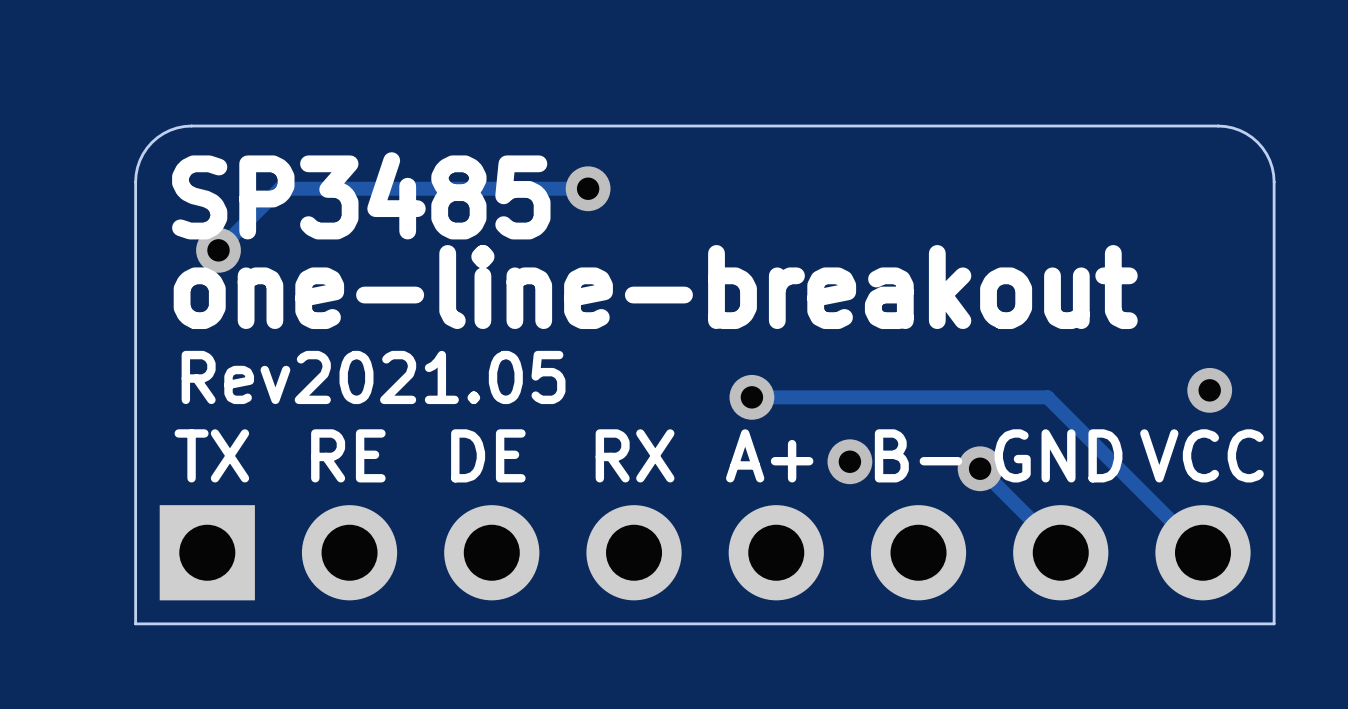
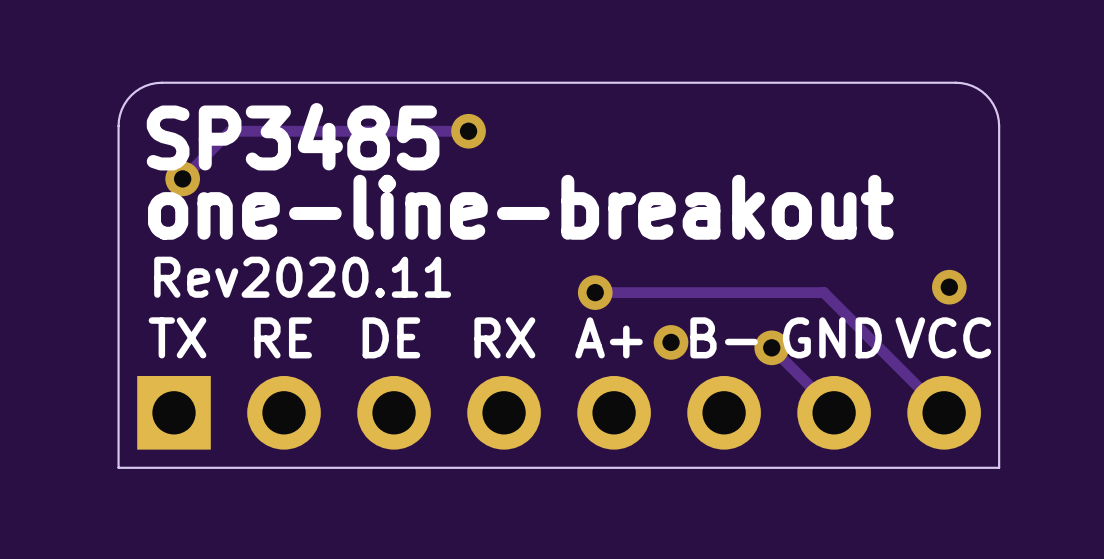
text: Rev2021.05 (373, 377) -> Rev2020.11 (302, 277)

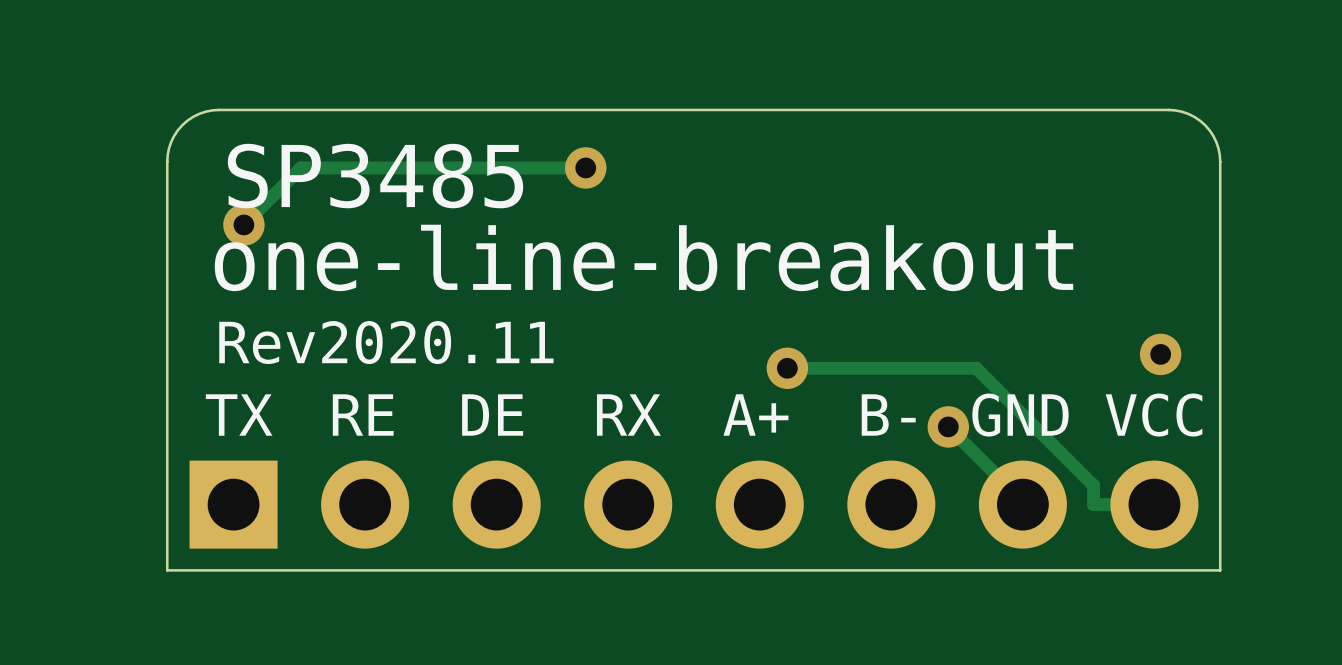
track: (595, 292) (823, 292) (944, 412) -> (787, 368) (976, 368) (1093, 485) (1093, 504) (1154, 504)
via: (595, 292) -> none
via: none -> (787, 368)
via: (671, 342) -> none

